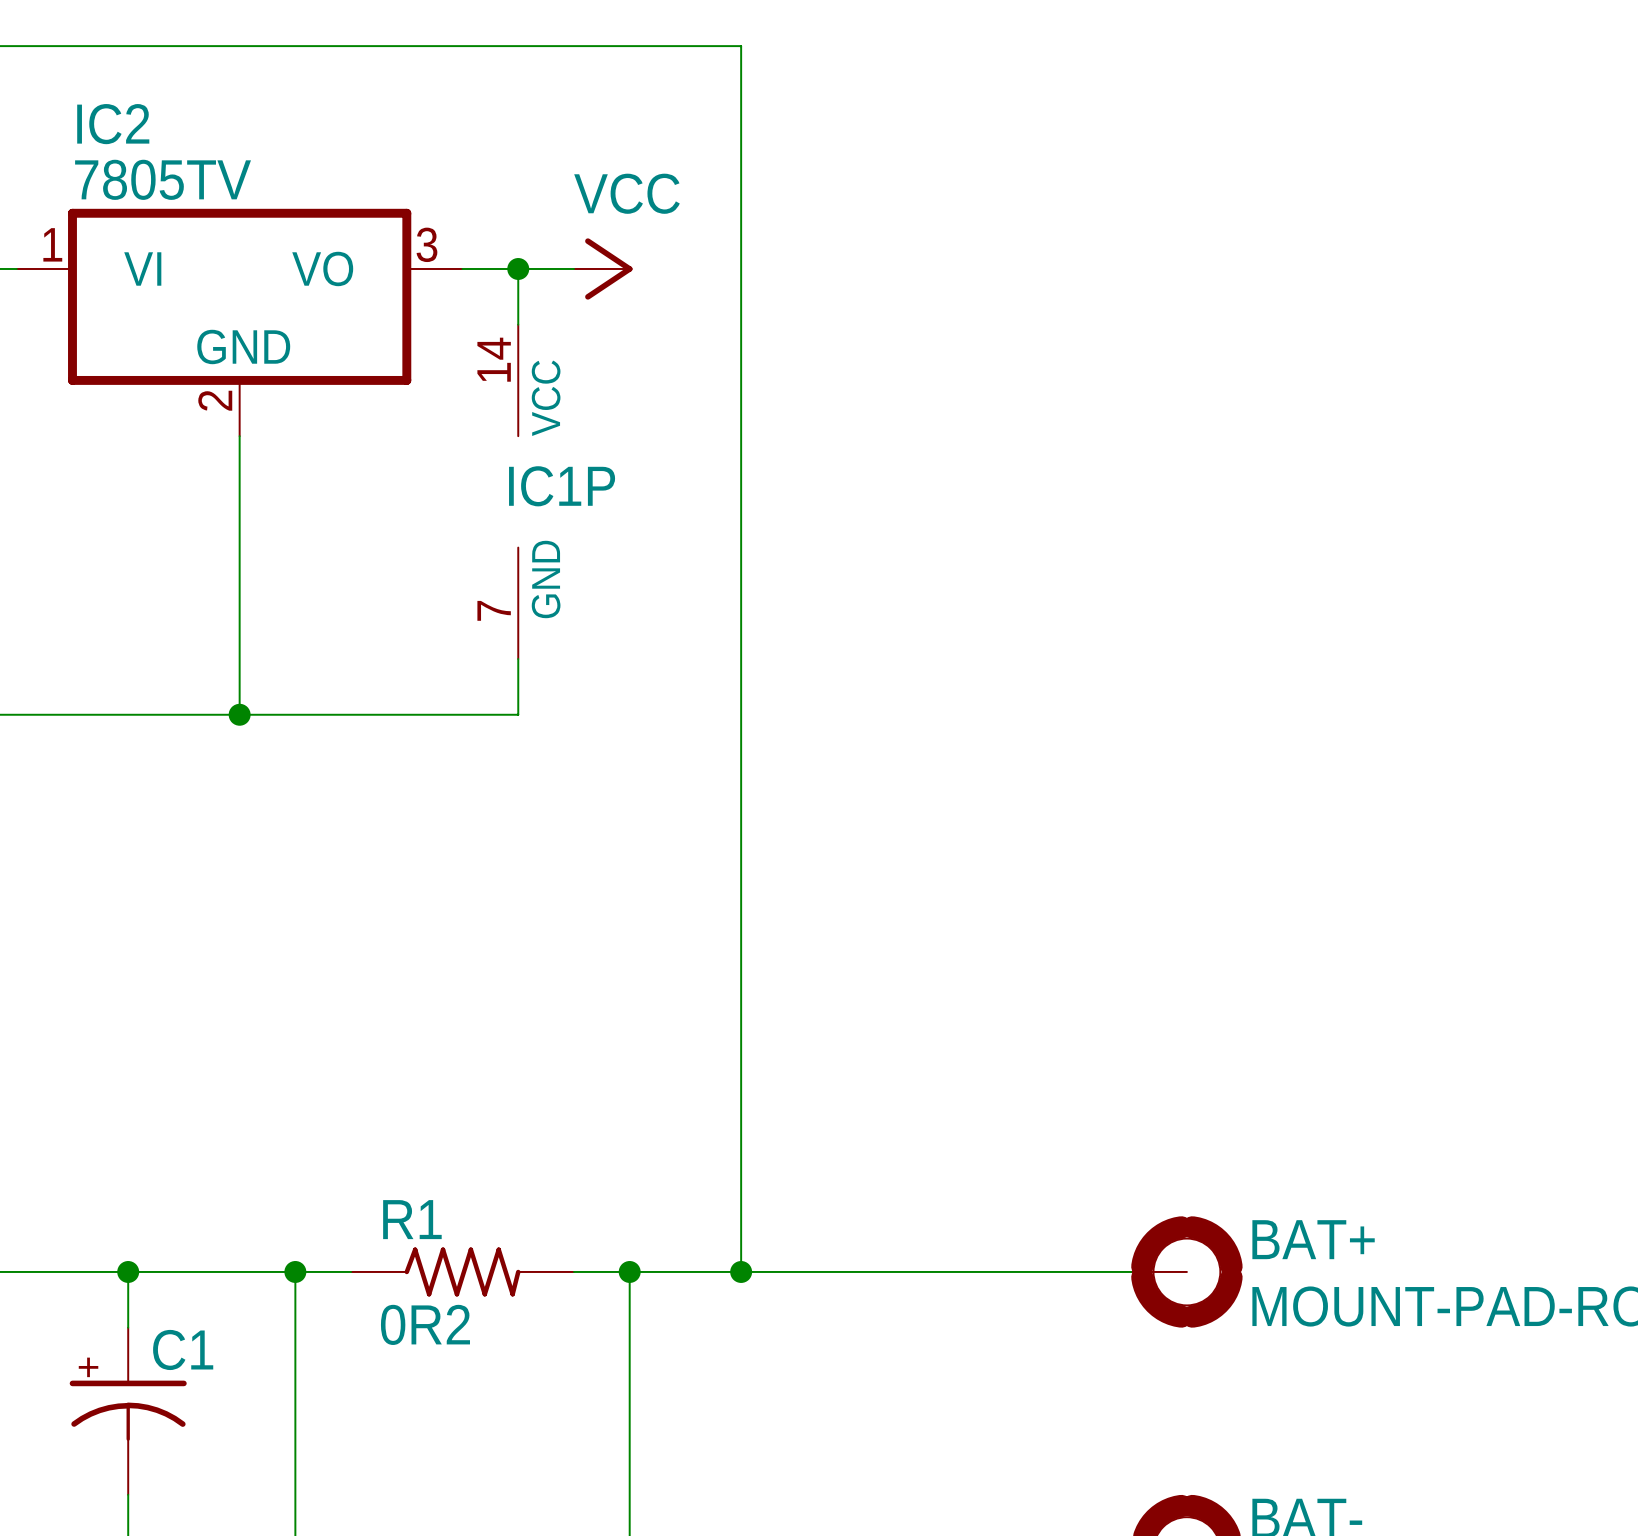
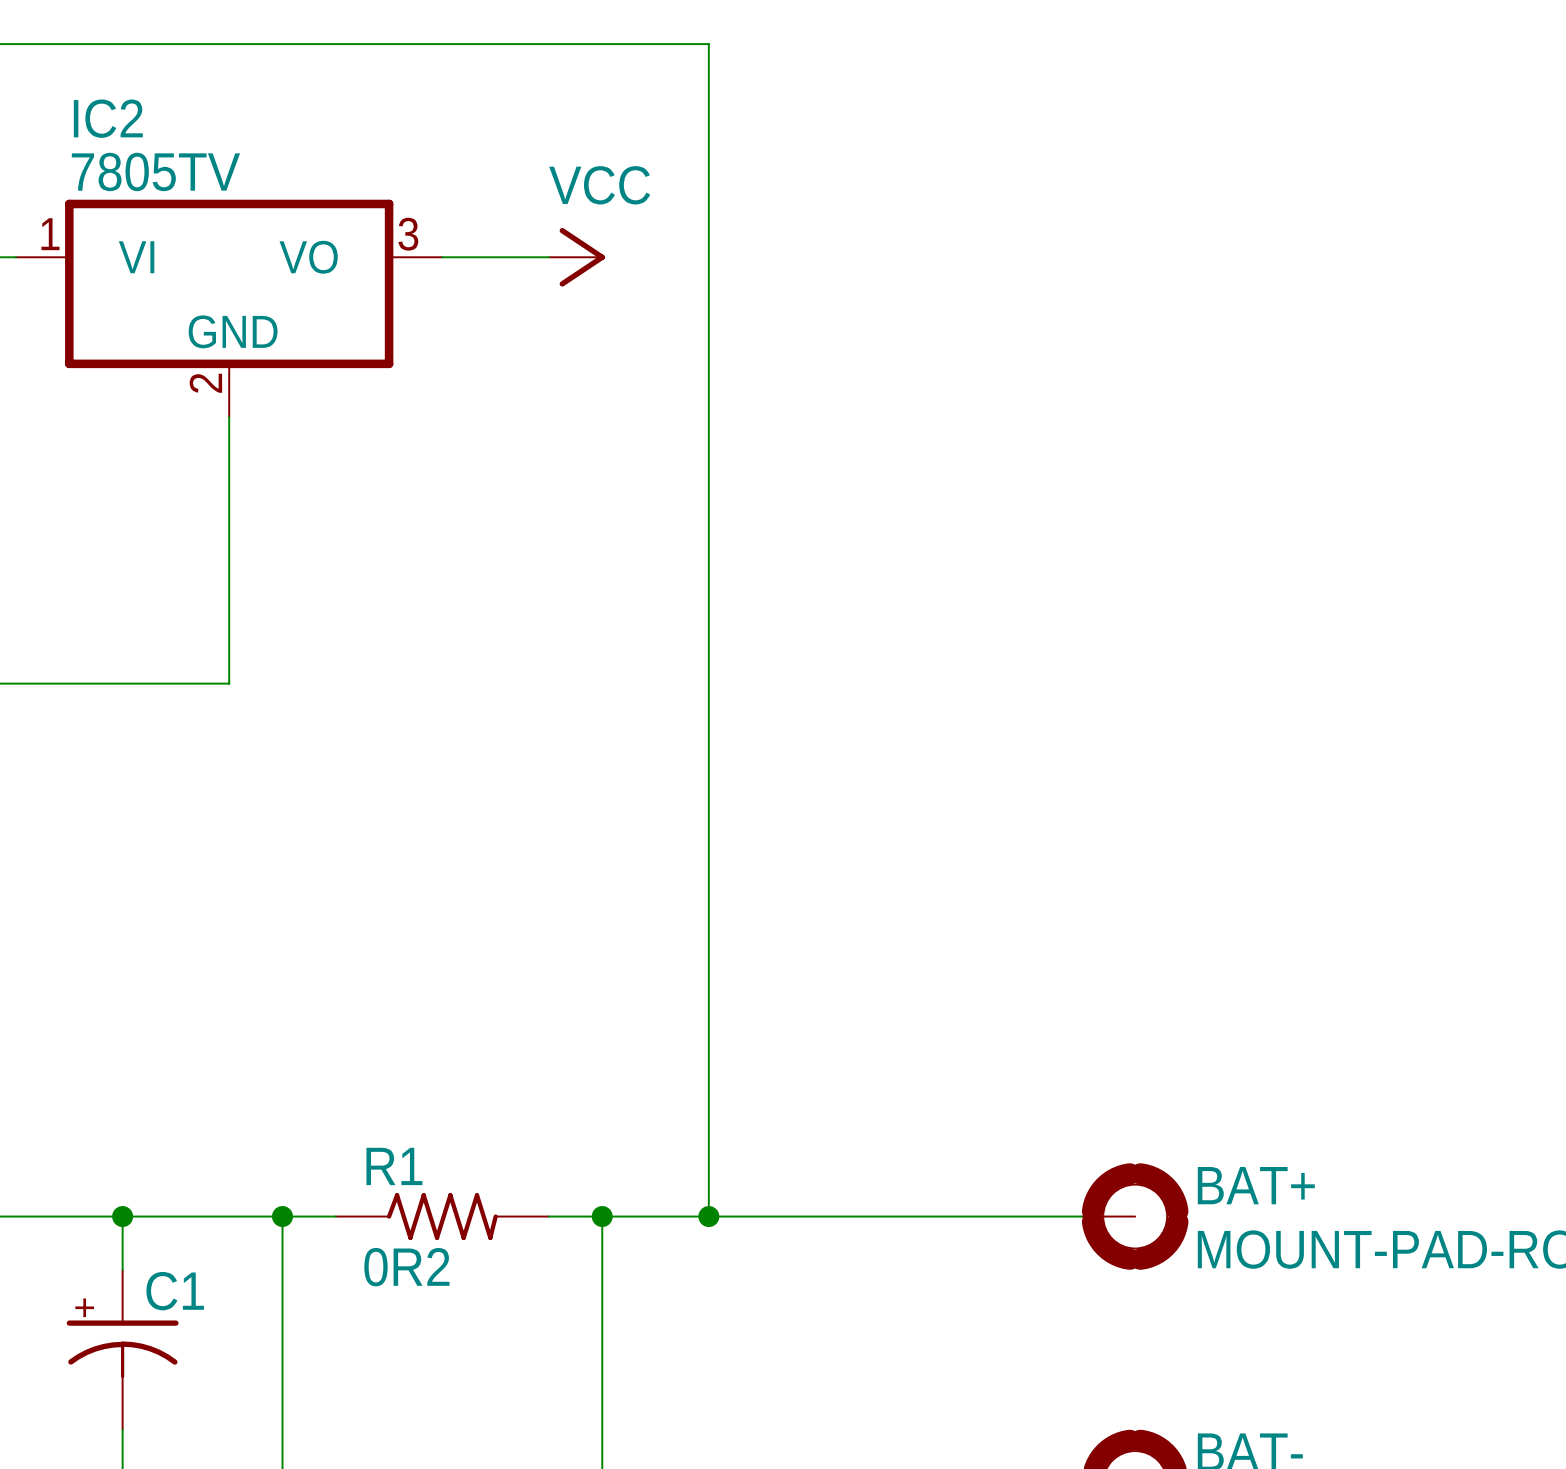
wire: (518, 268) (518, 324) -> none
junction: (518, 268) -> none
IC1P: (518, 491) -> none
wire: (518, 659) (518, 714) (239, 714) -> none
junction: (239, 714) -> none

